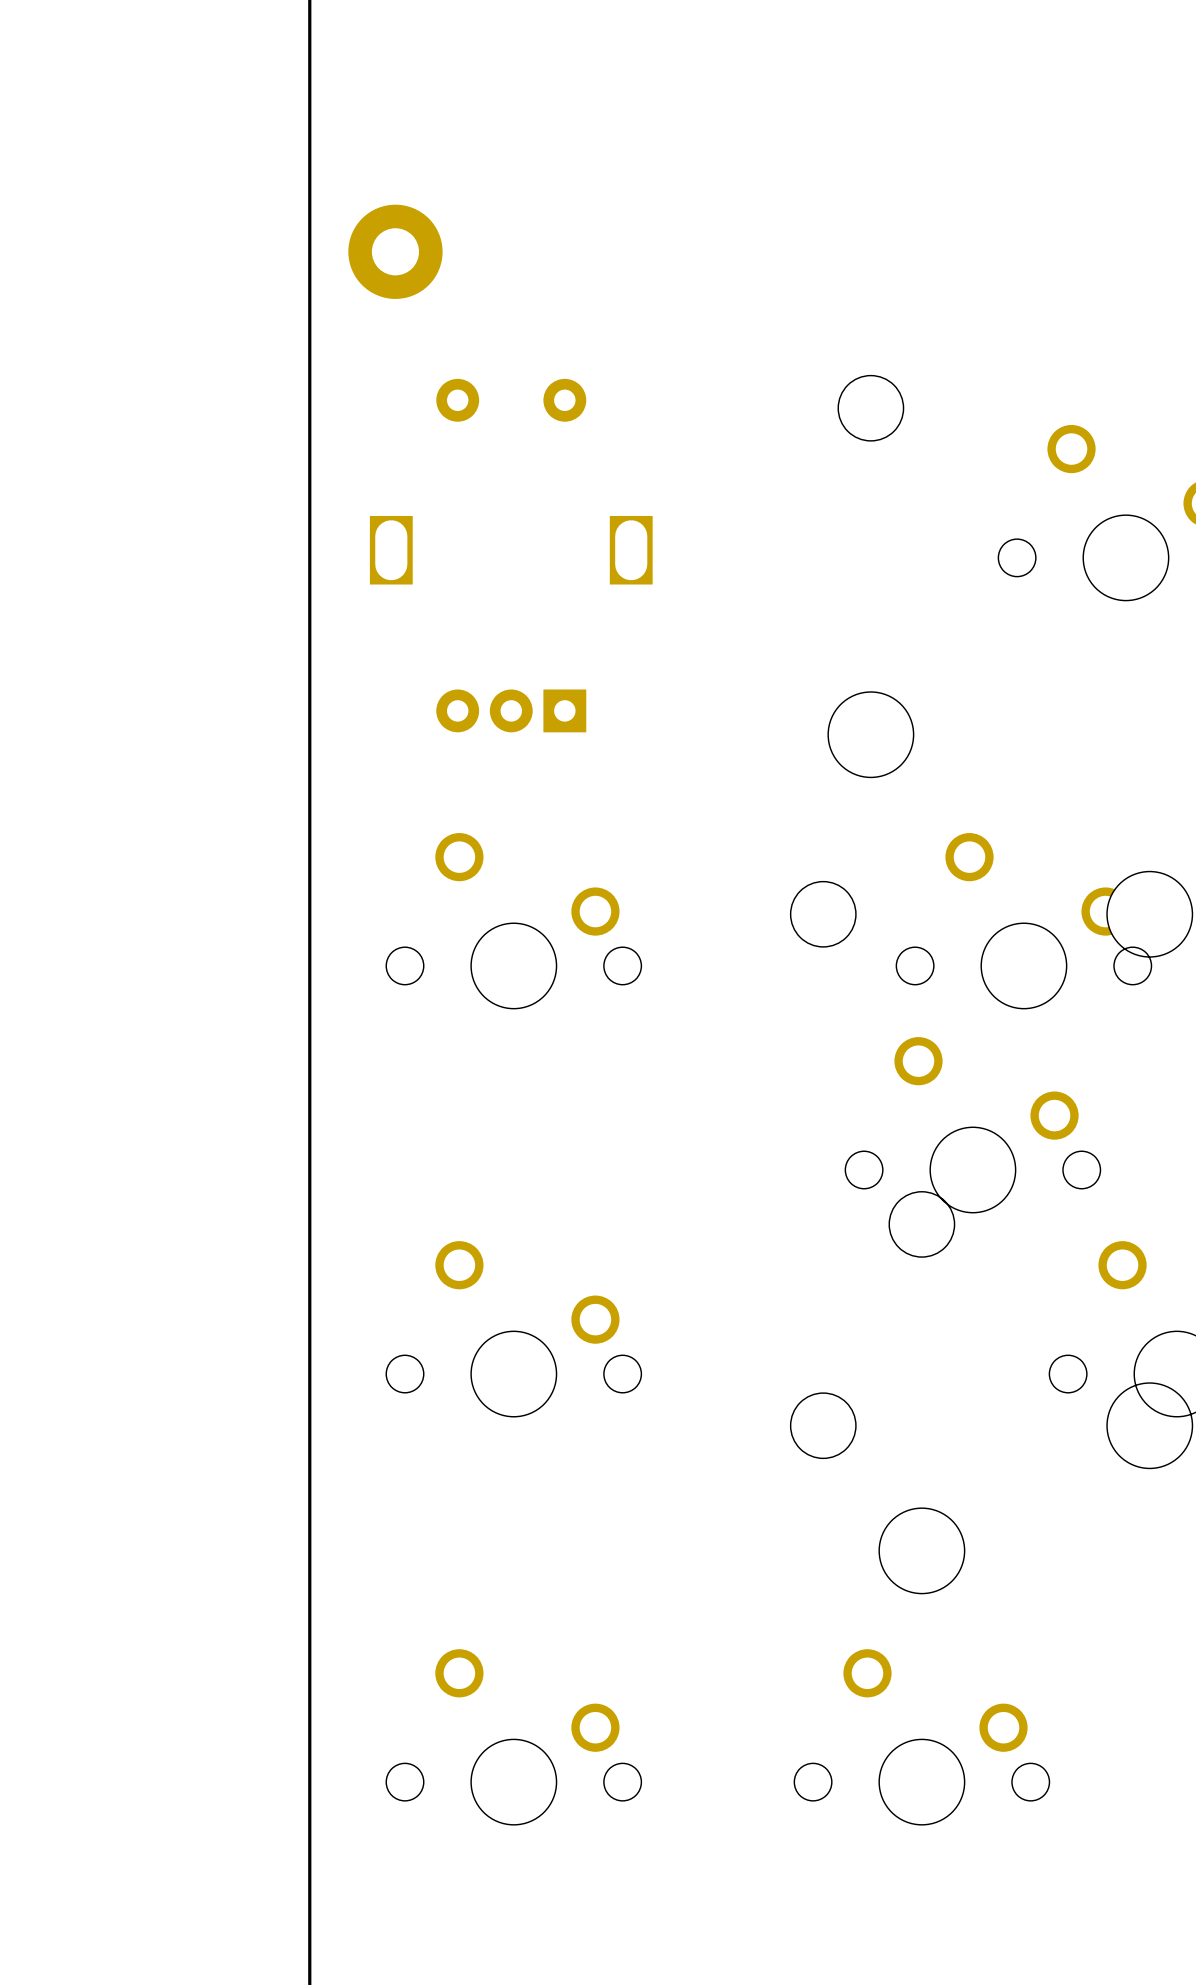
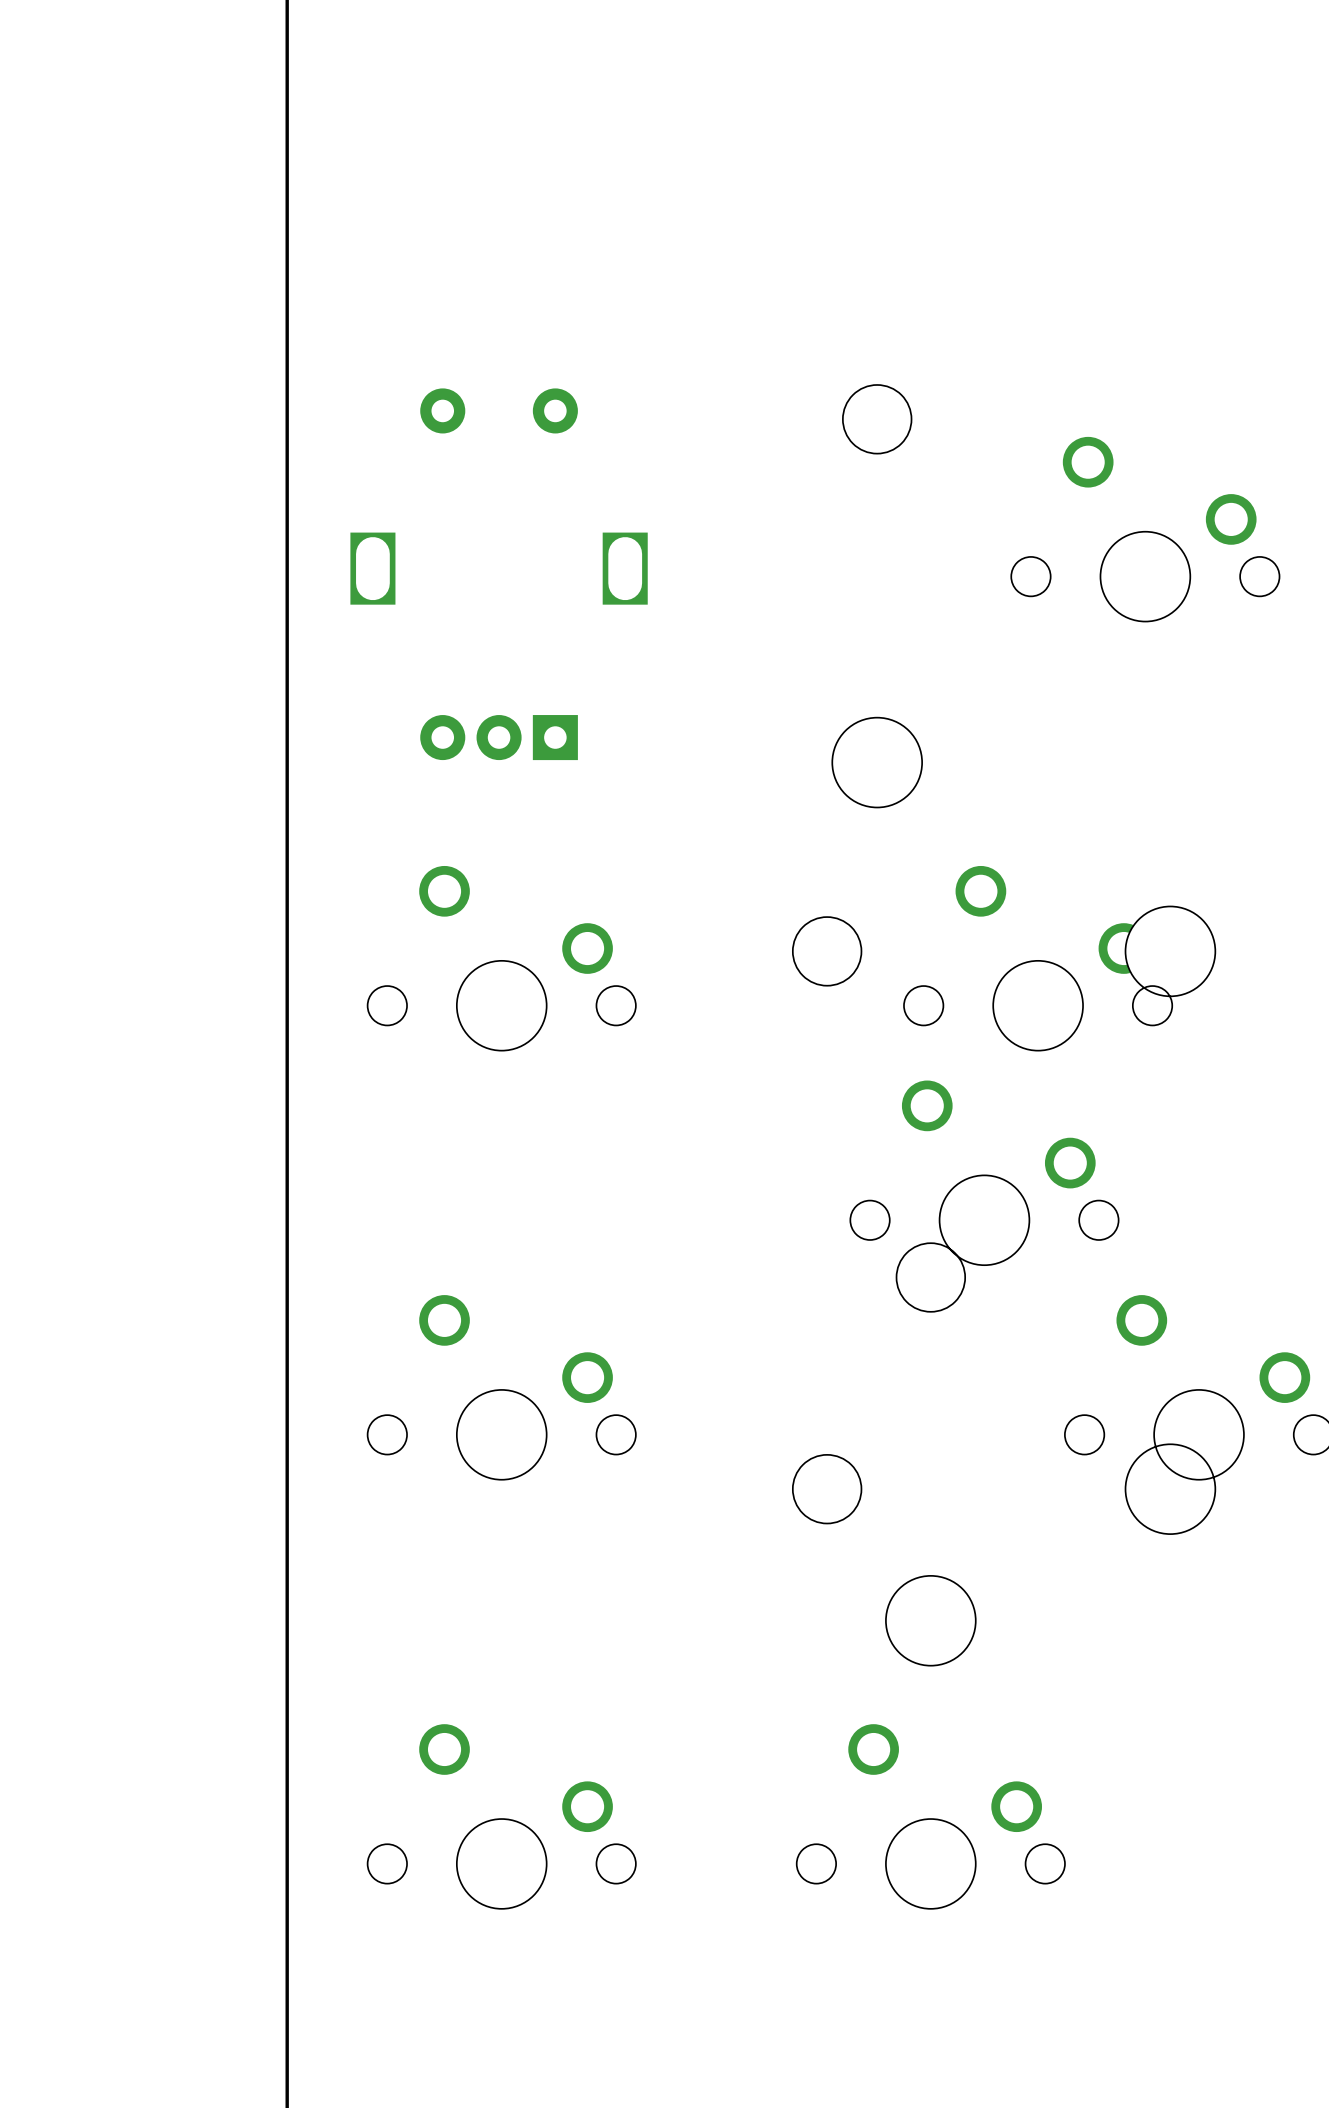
part: (395, 251) -> none

